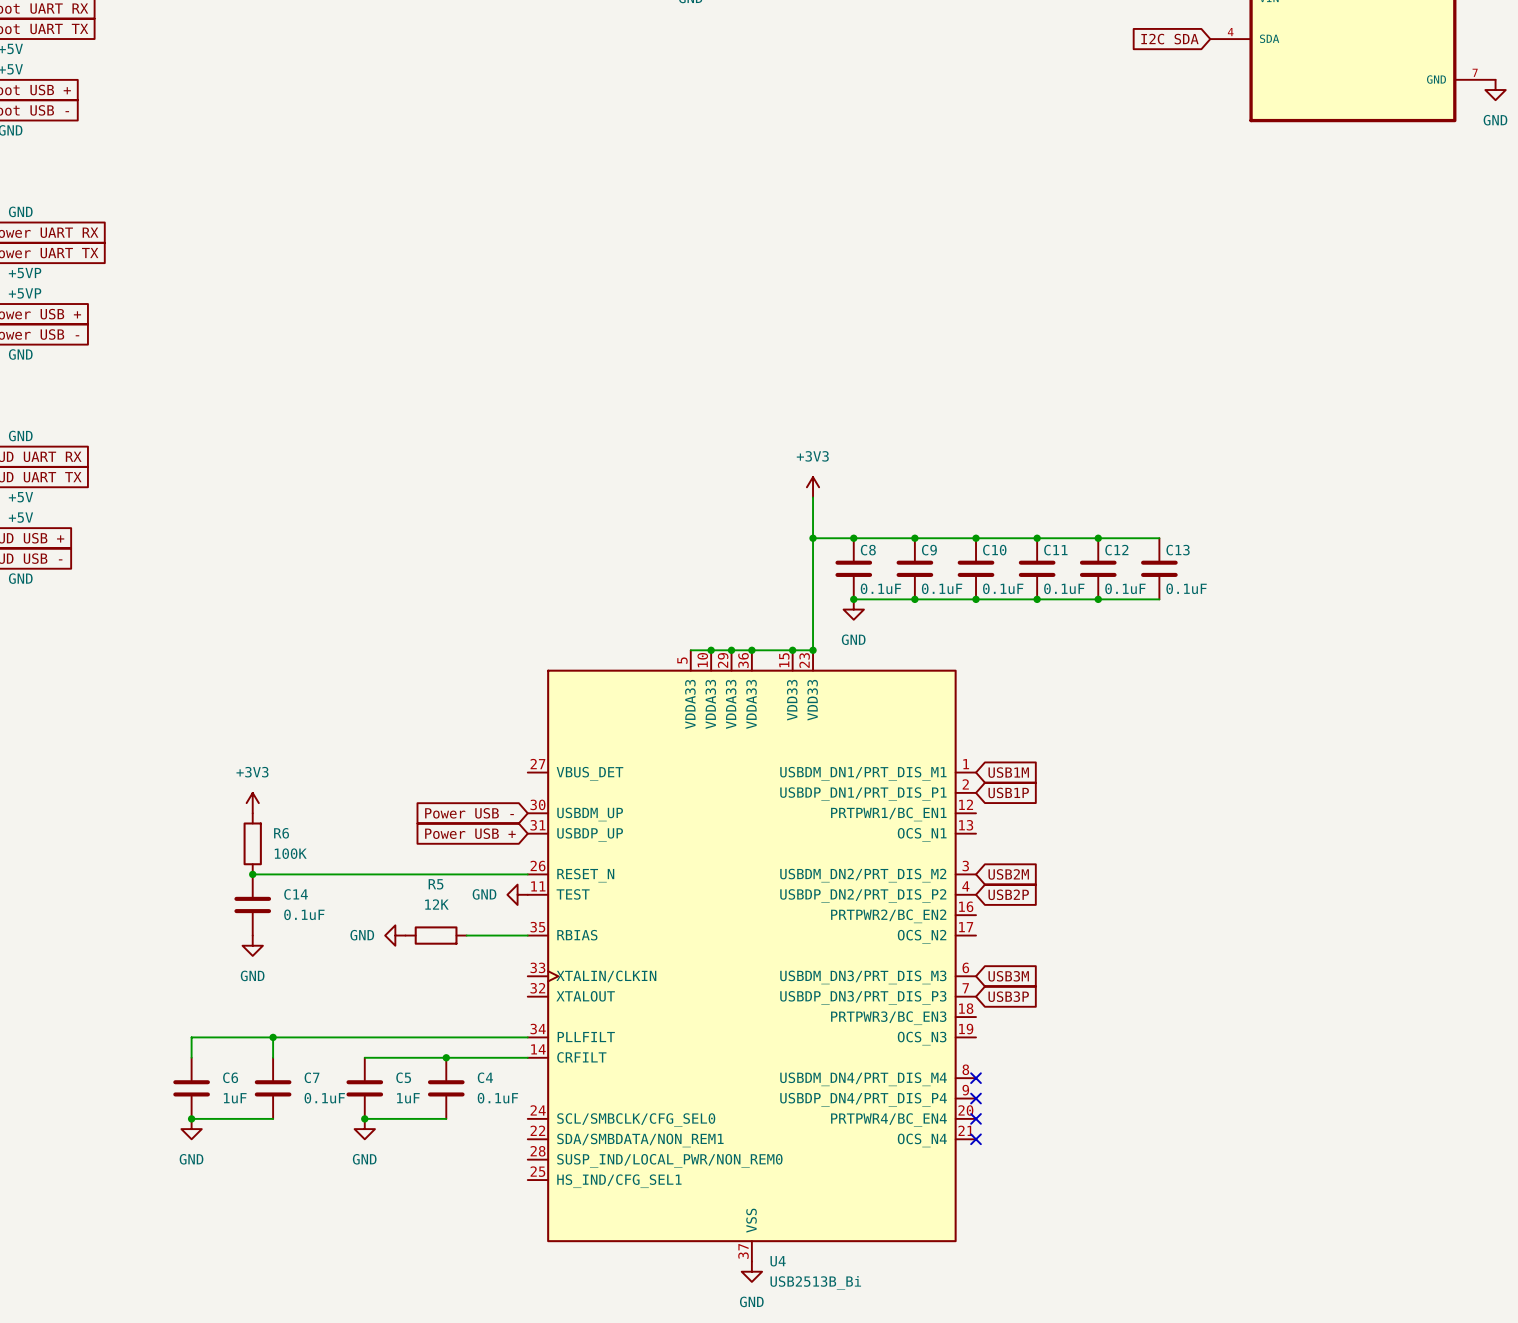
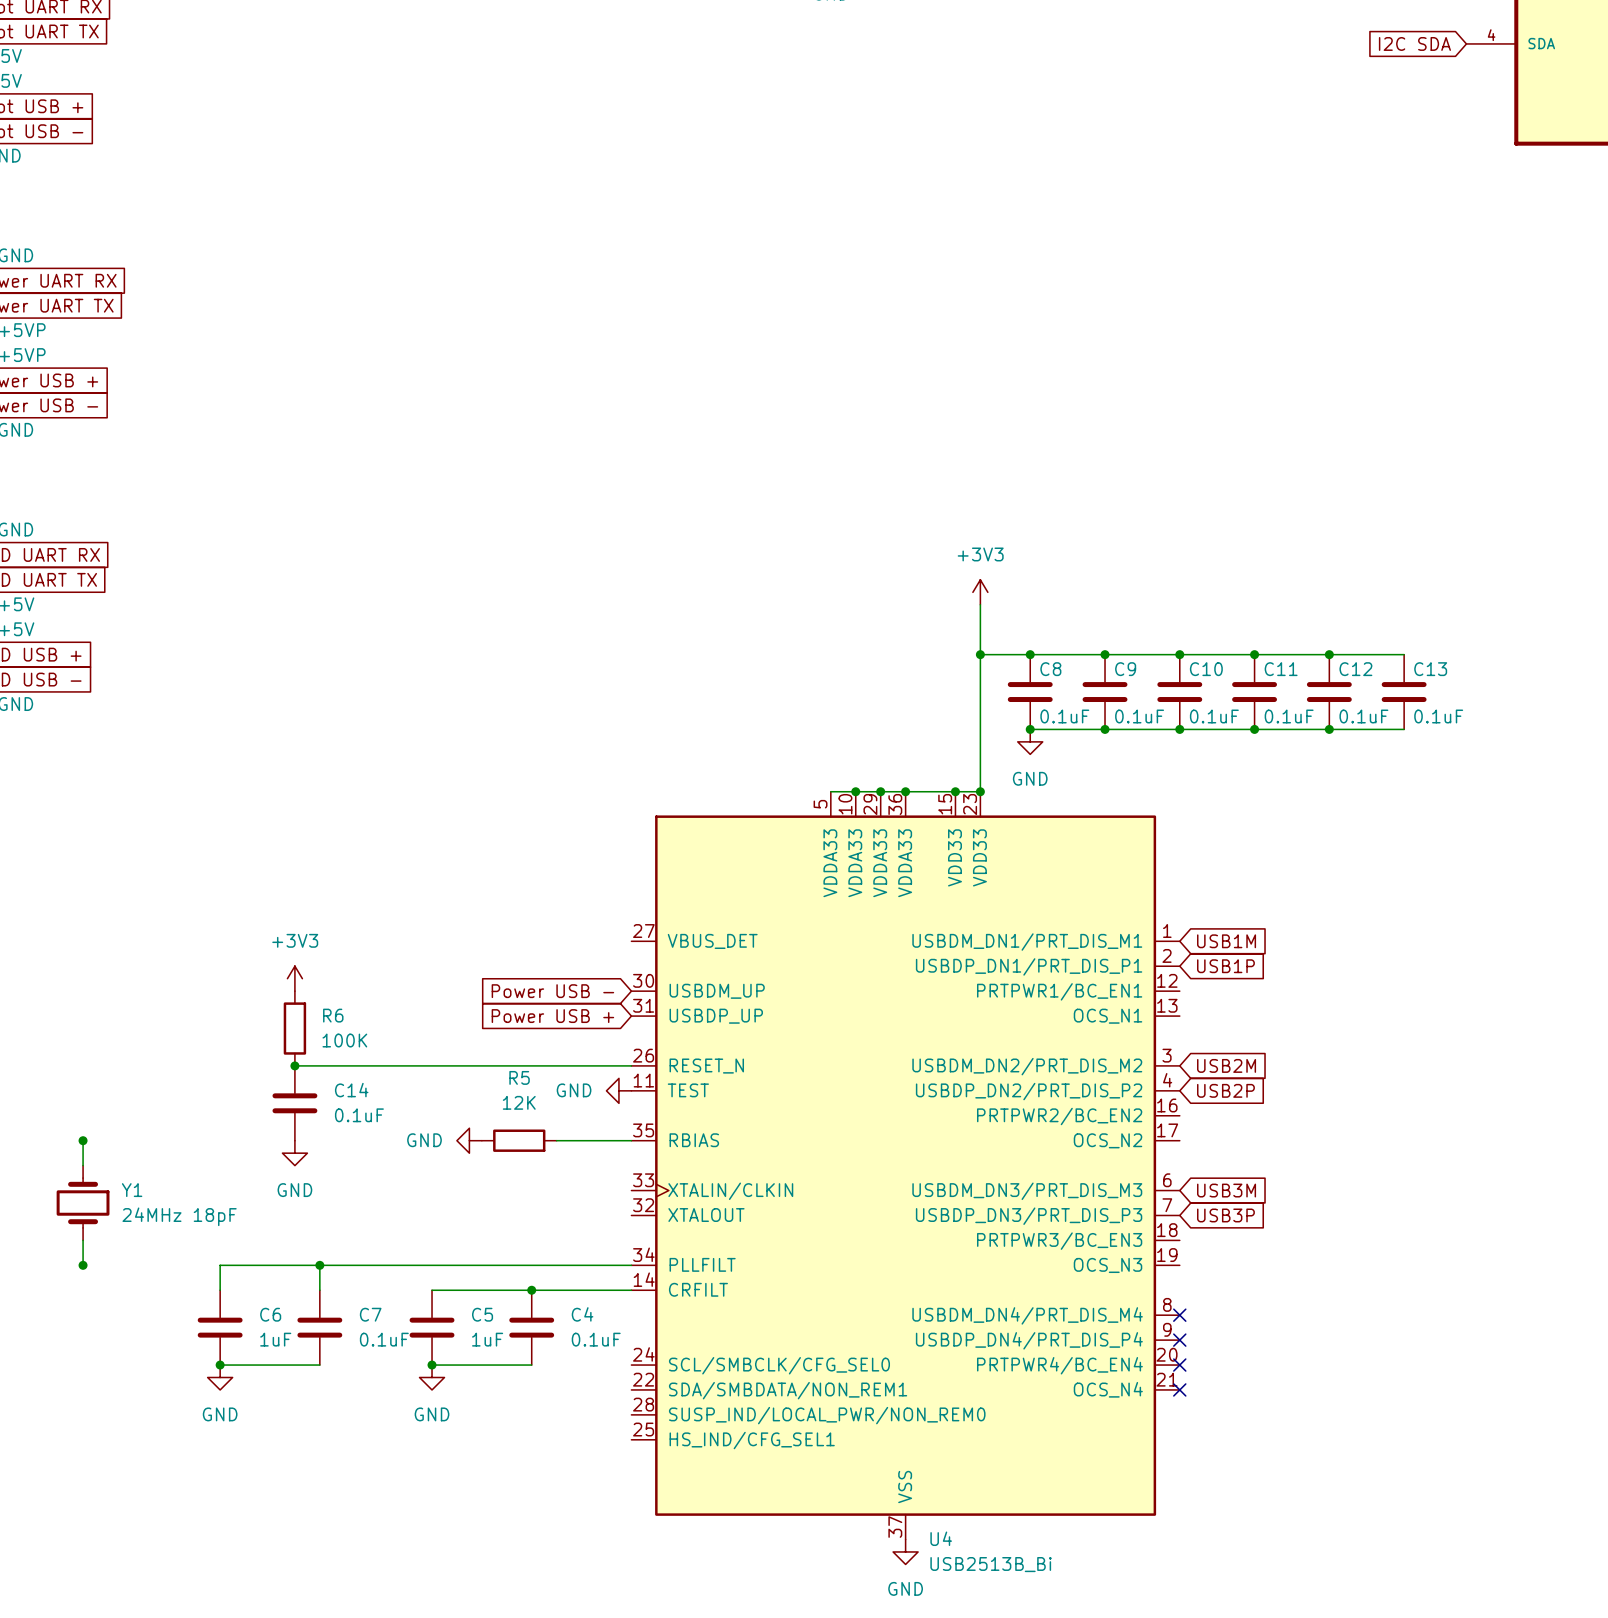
wire: none -> (83, 1140) (83, 1165)
junction: none -> (83, 1140)
Y1: none -> 24MHz 18pF (83, 1203)
wire: none -> (83, 1240) (83, 1265)
junction: none -> (83, 1265)

